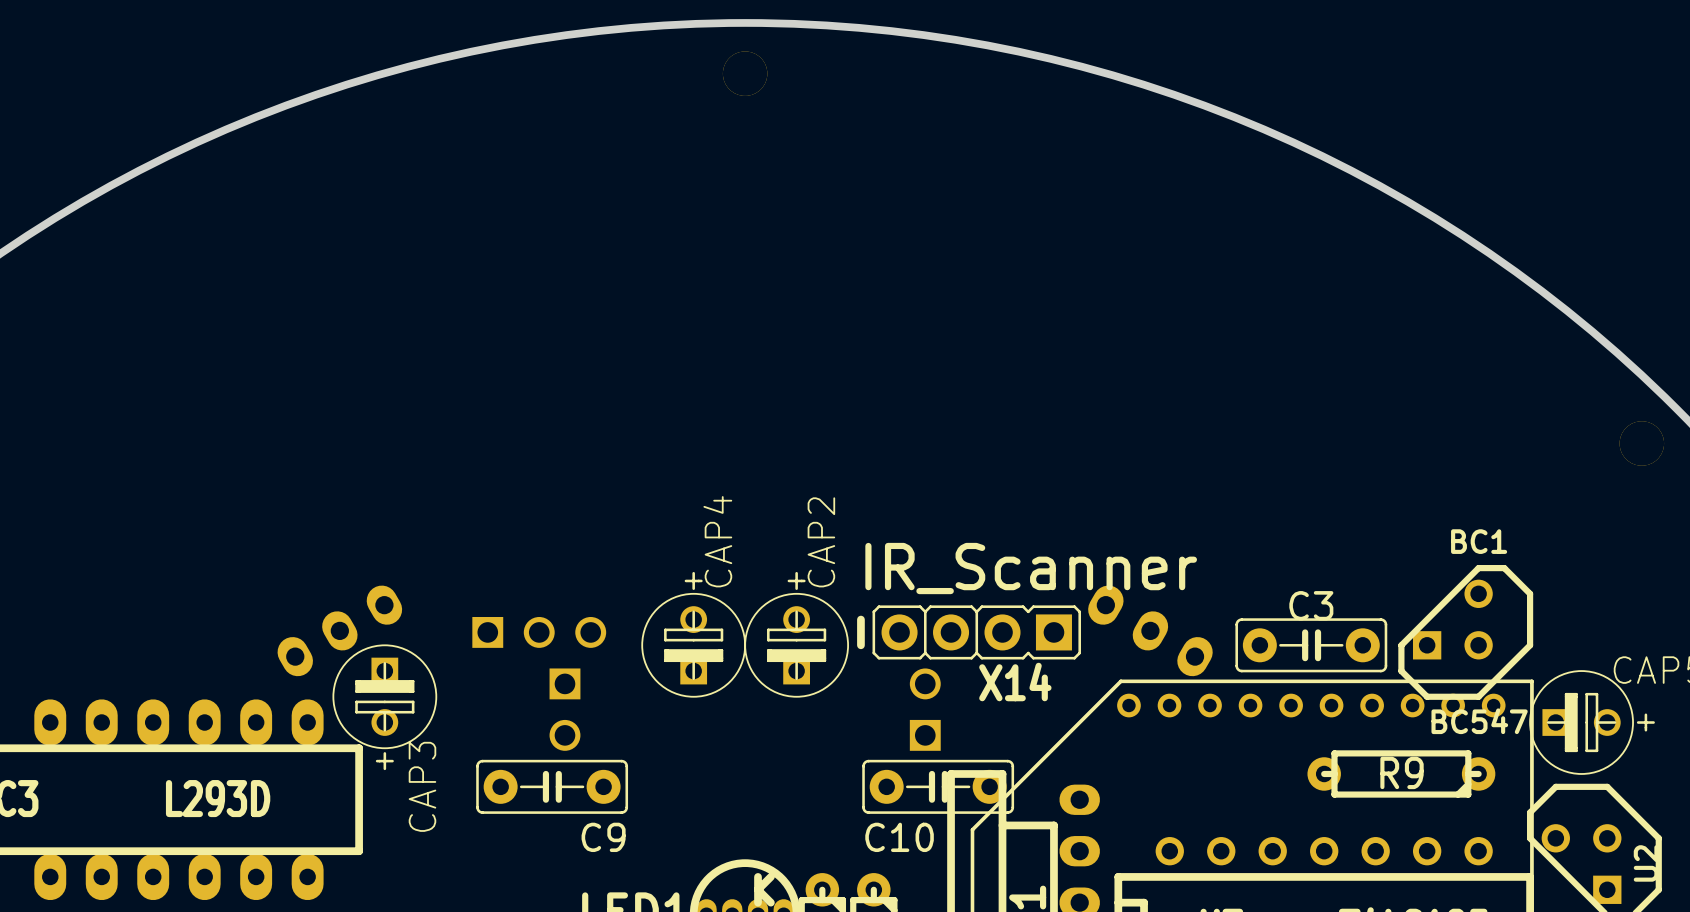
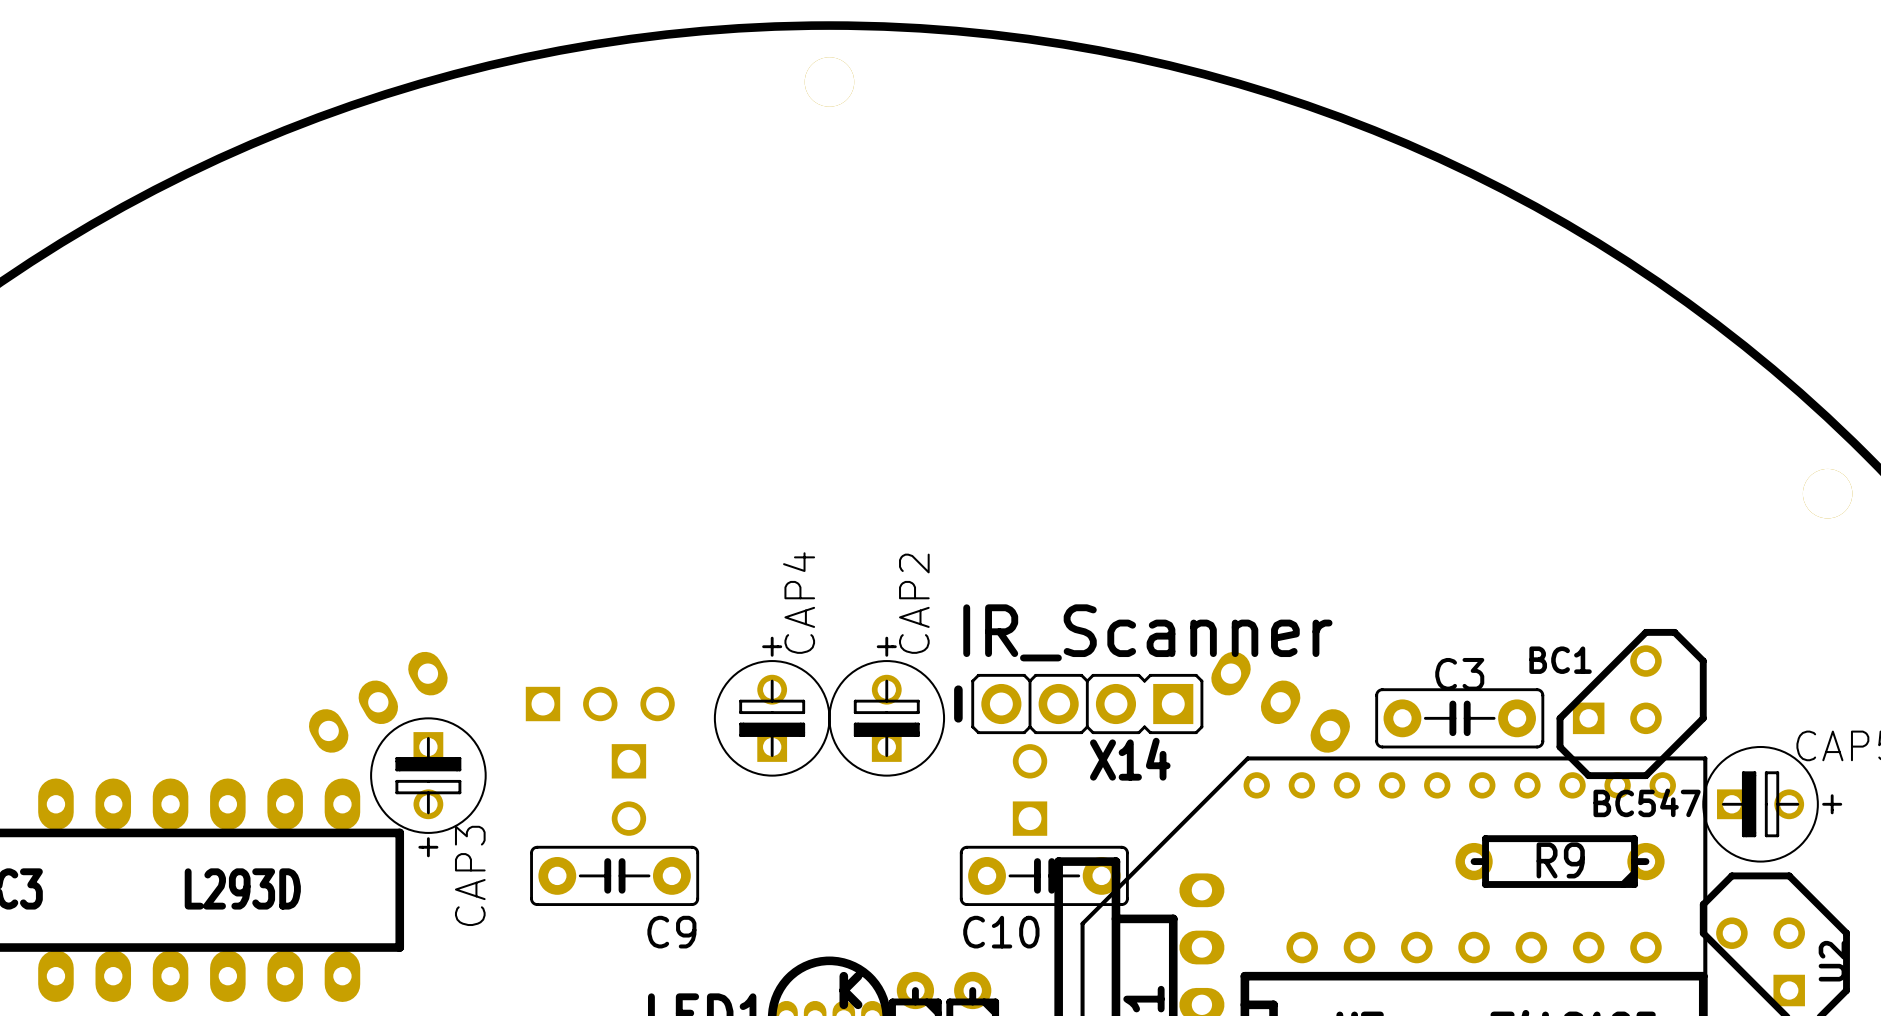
BC1 name position: BC1 (1479, 541) -> BC1 (1560, 660)

